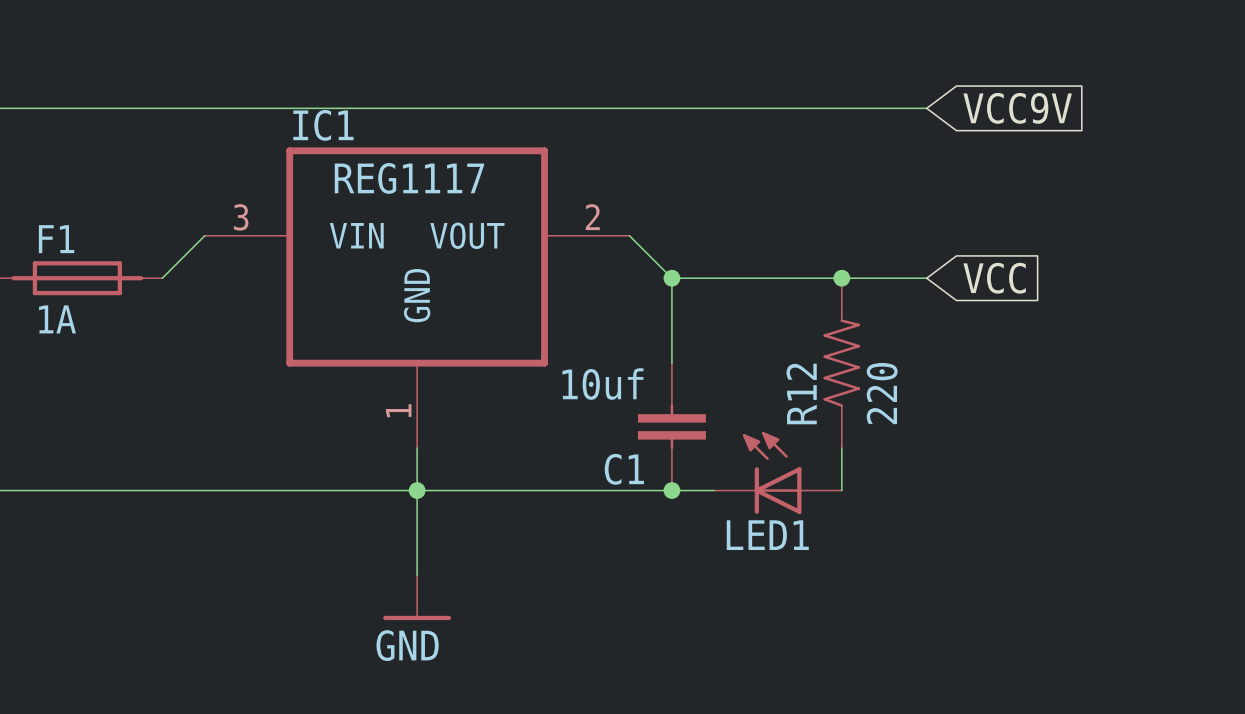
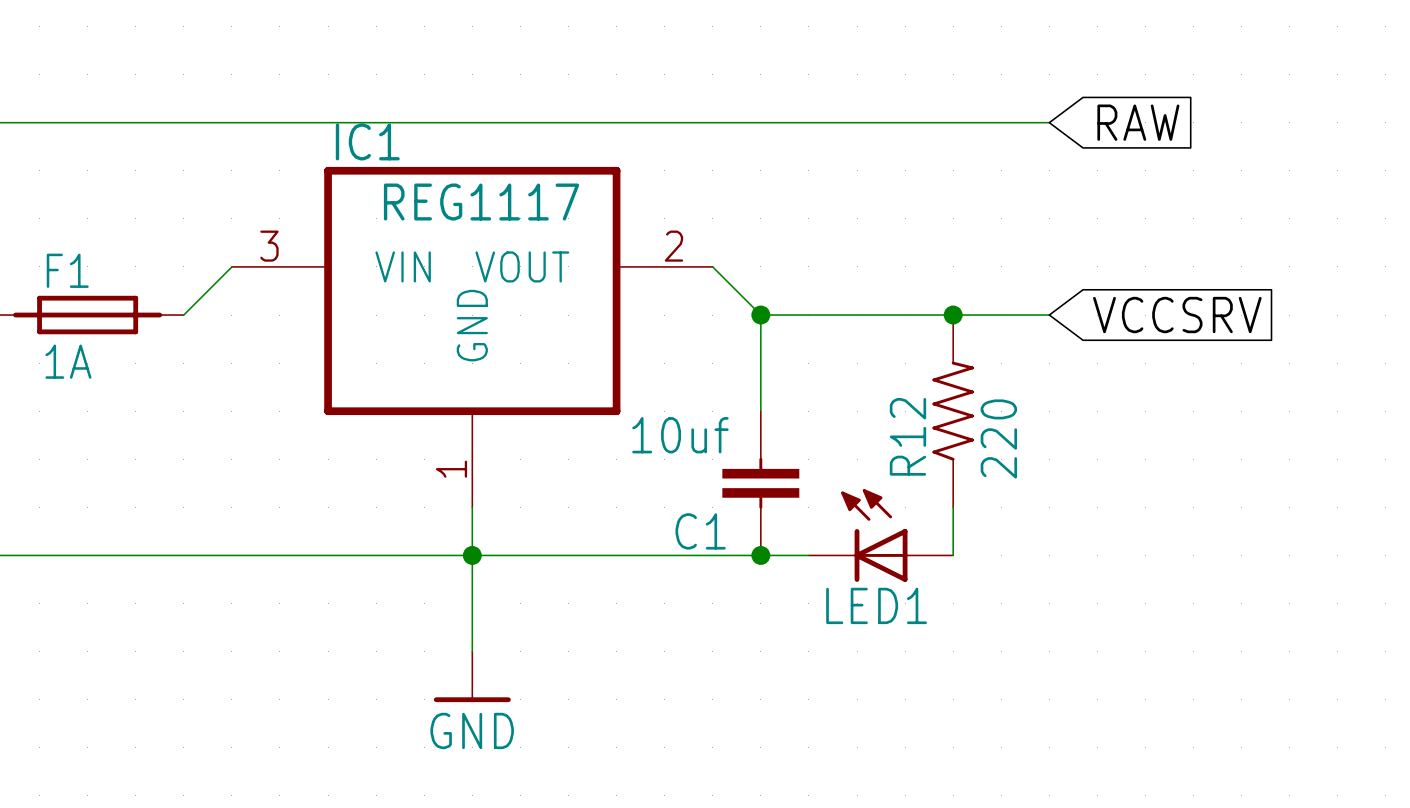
global label: VCC9V (1017, 108) -> RAW (1138, 122)
global label: VCC (994, 278) -> VCCSRV (1177, 315)

